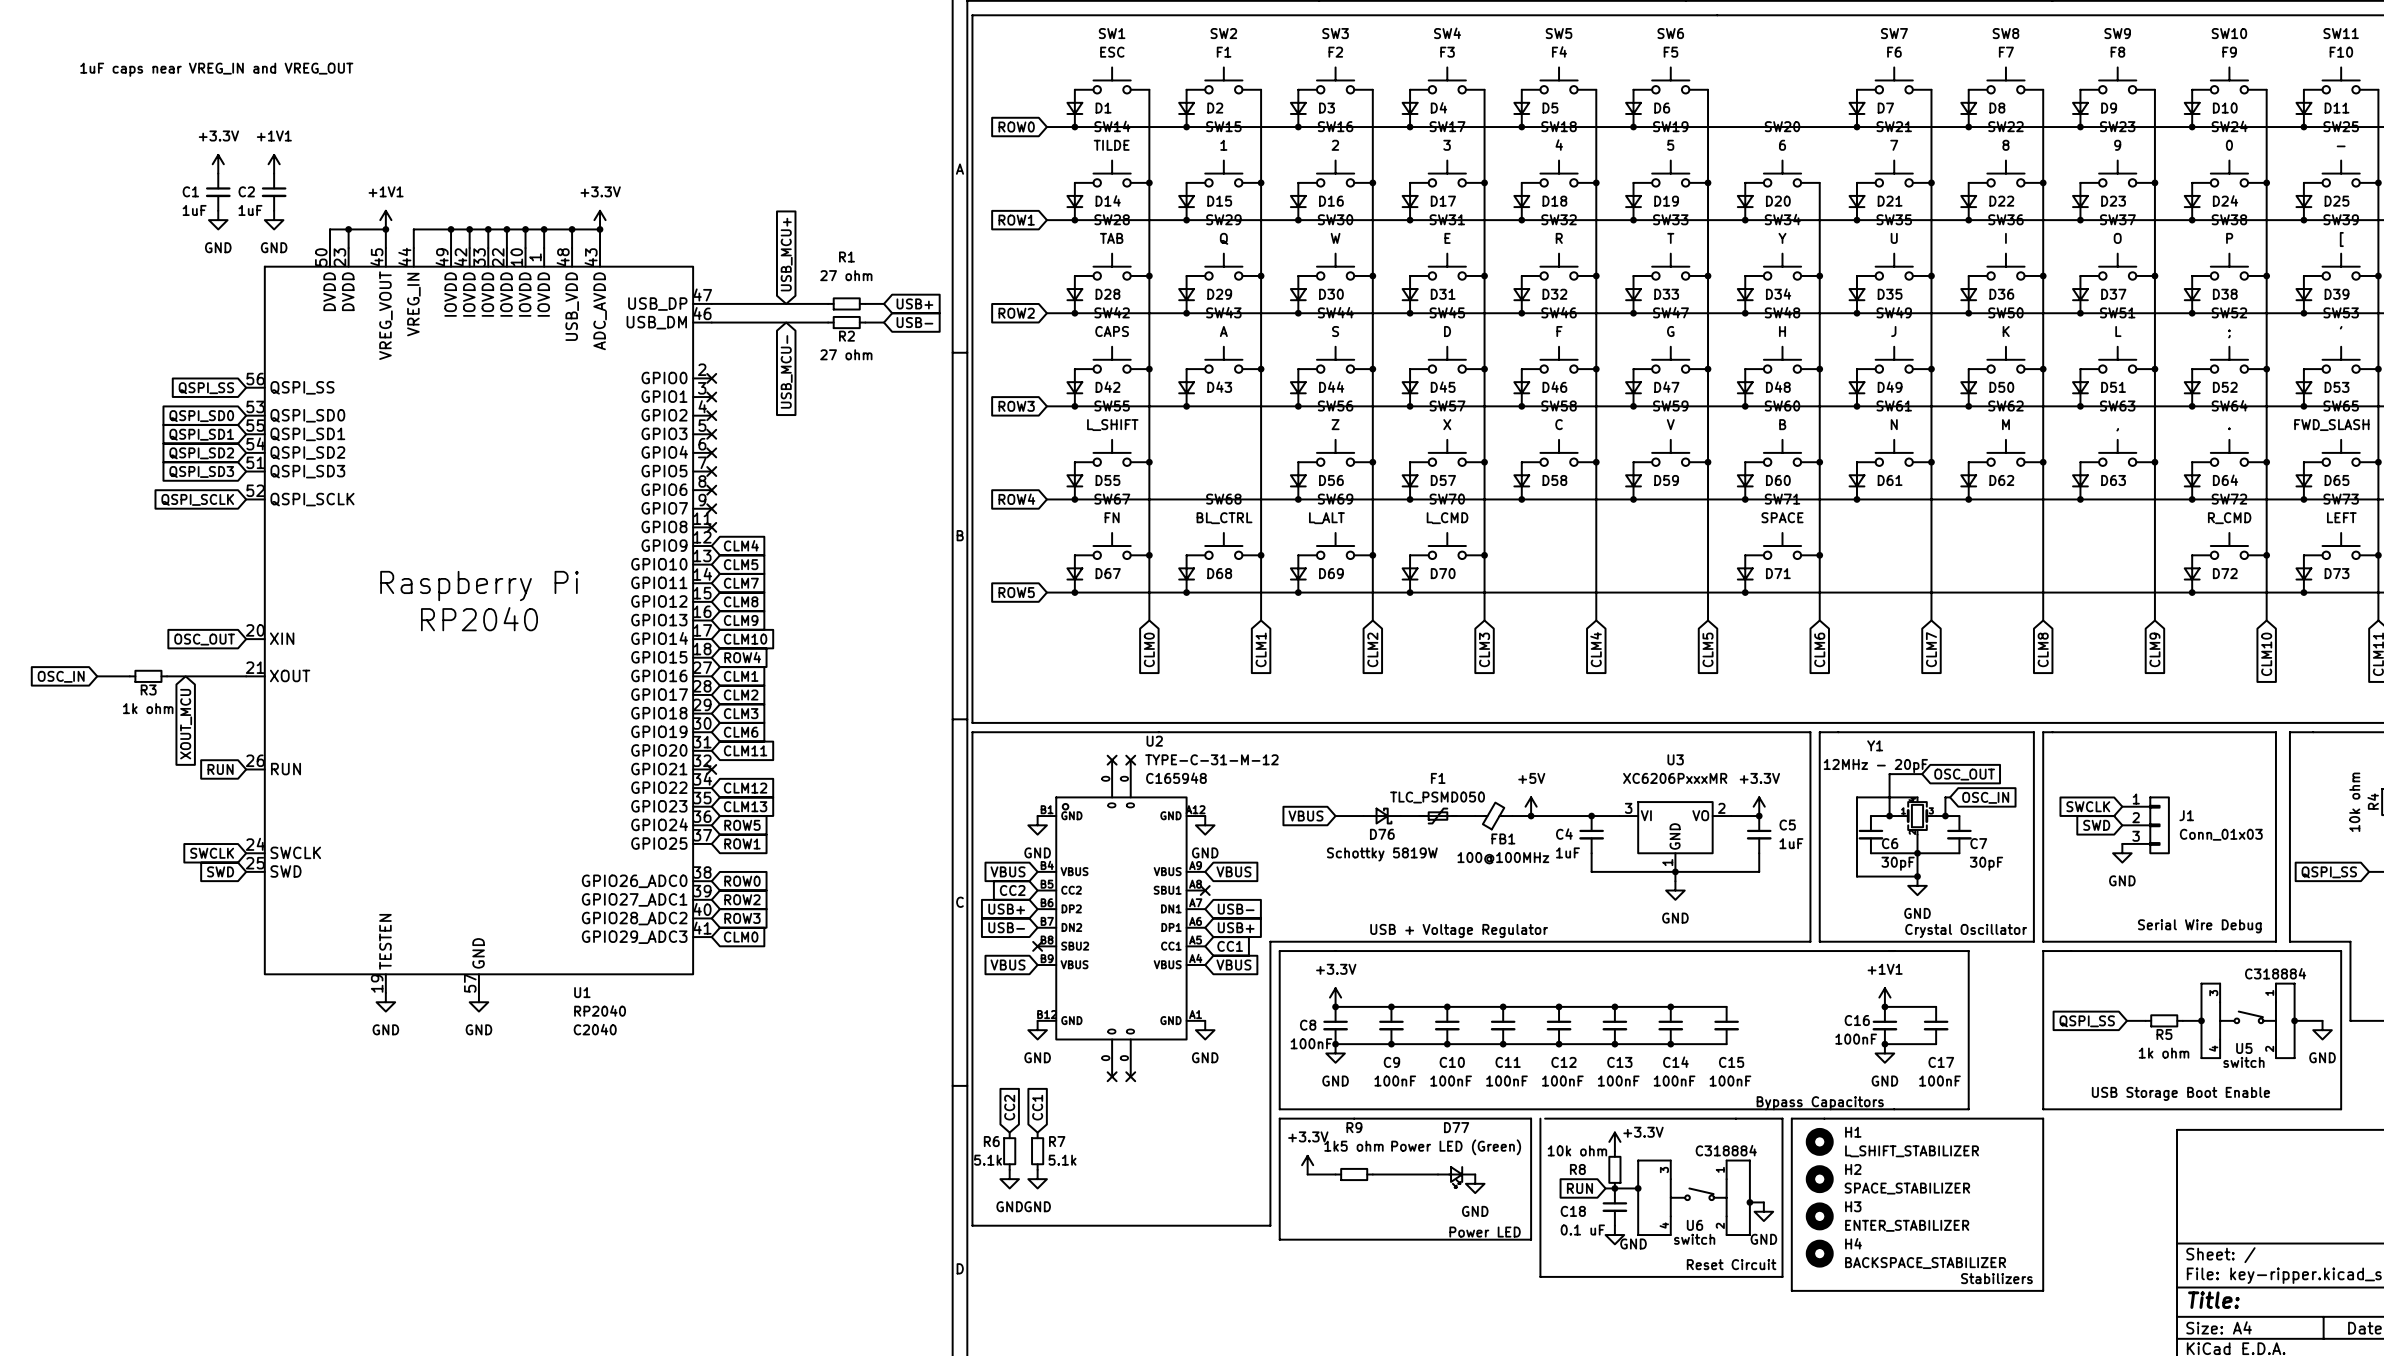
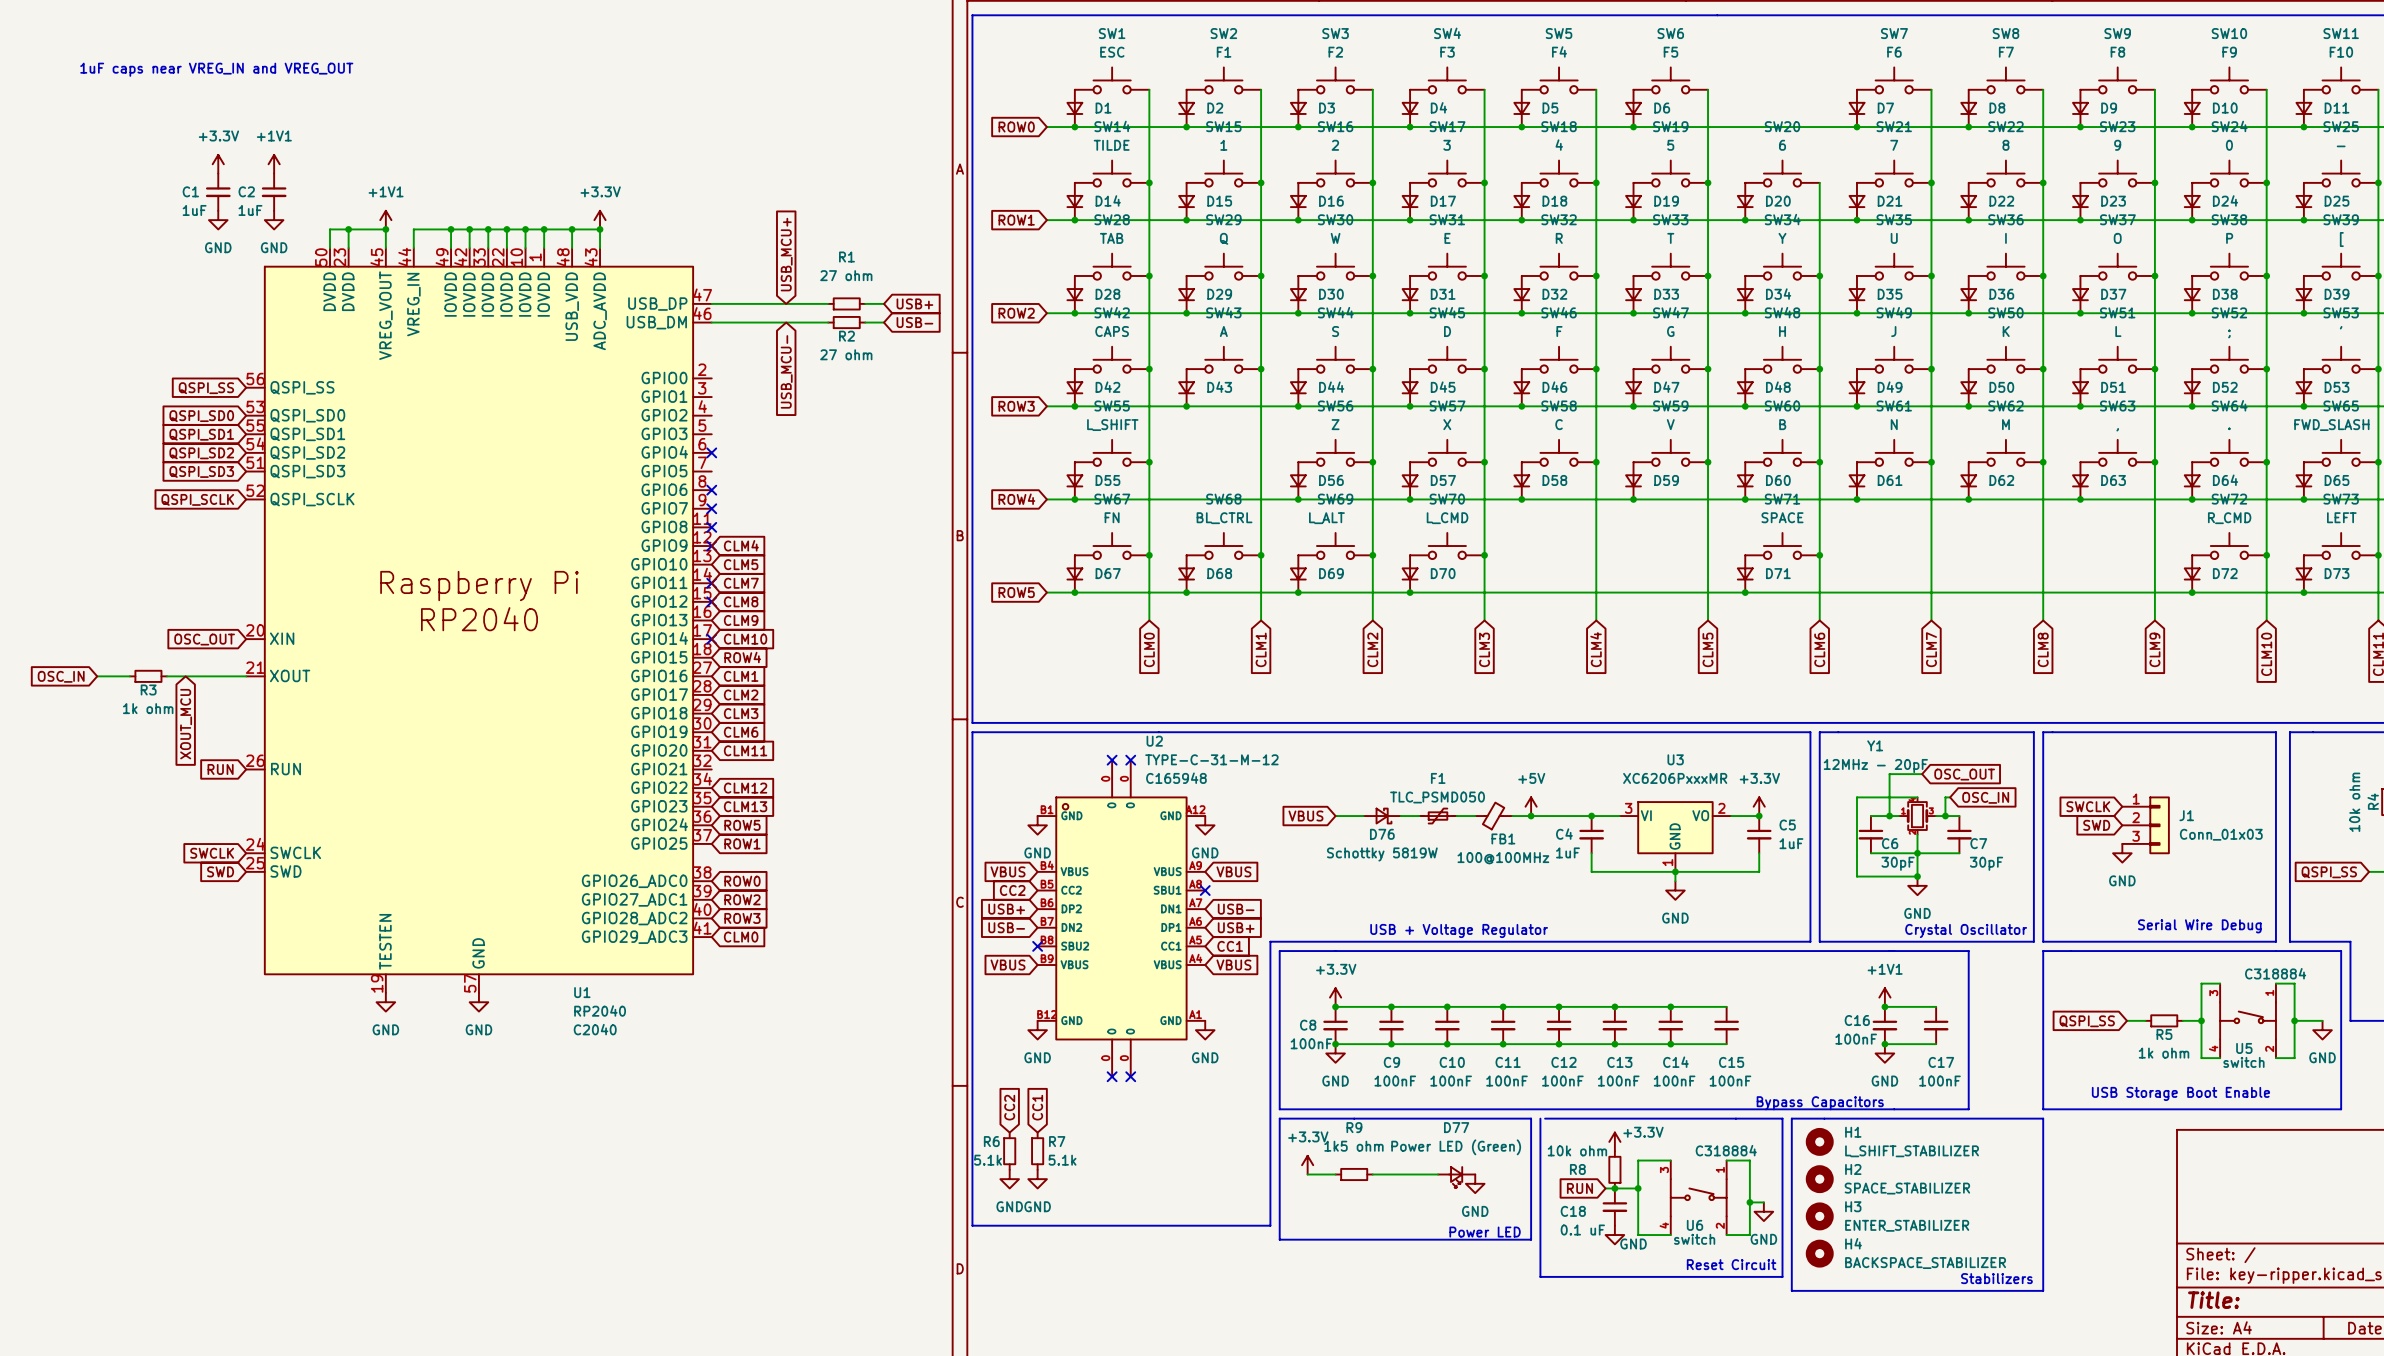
no-connect mark: (711, 378) -> none
no-connect mark: (711, 397) -> none
no-connect mark: (711, 415) -> none
no-connect mark: (711, 434) -> none
no-connect mark: (711, 471) -> none
no-connect mark: none -> (711, 546)
no-connect mark: none -> (711, 583)
no-connect mark: none -> (711, 601)
no-connect mark: none -> (711, 639)
no-connect mark: (711, 769) -> none

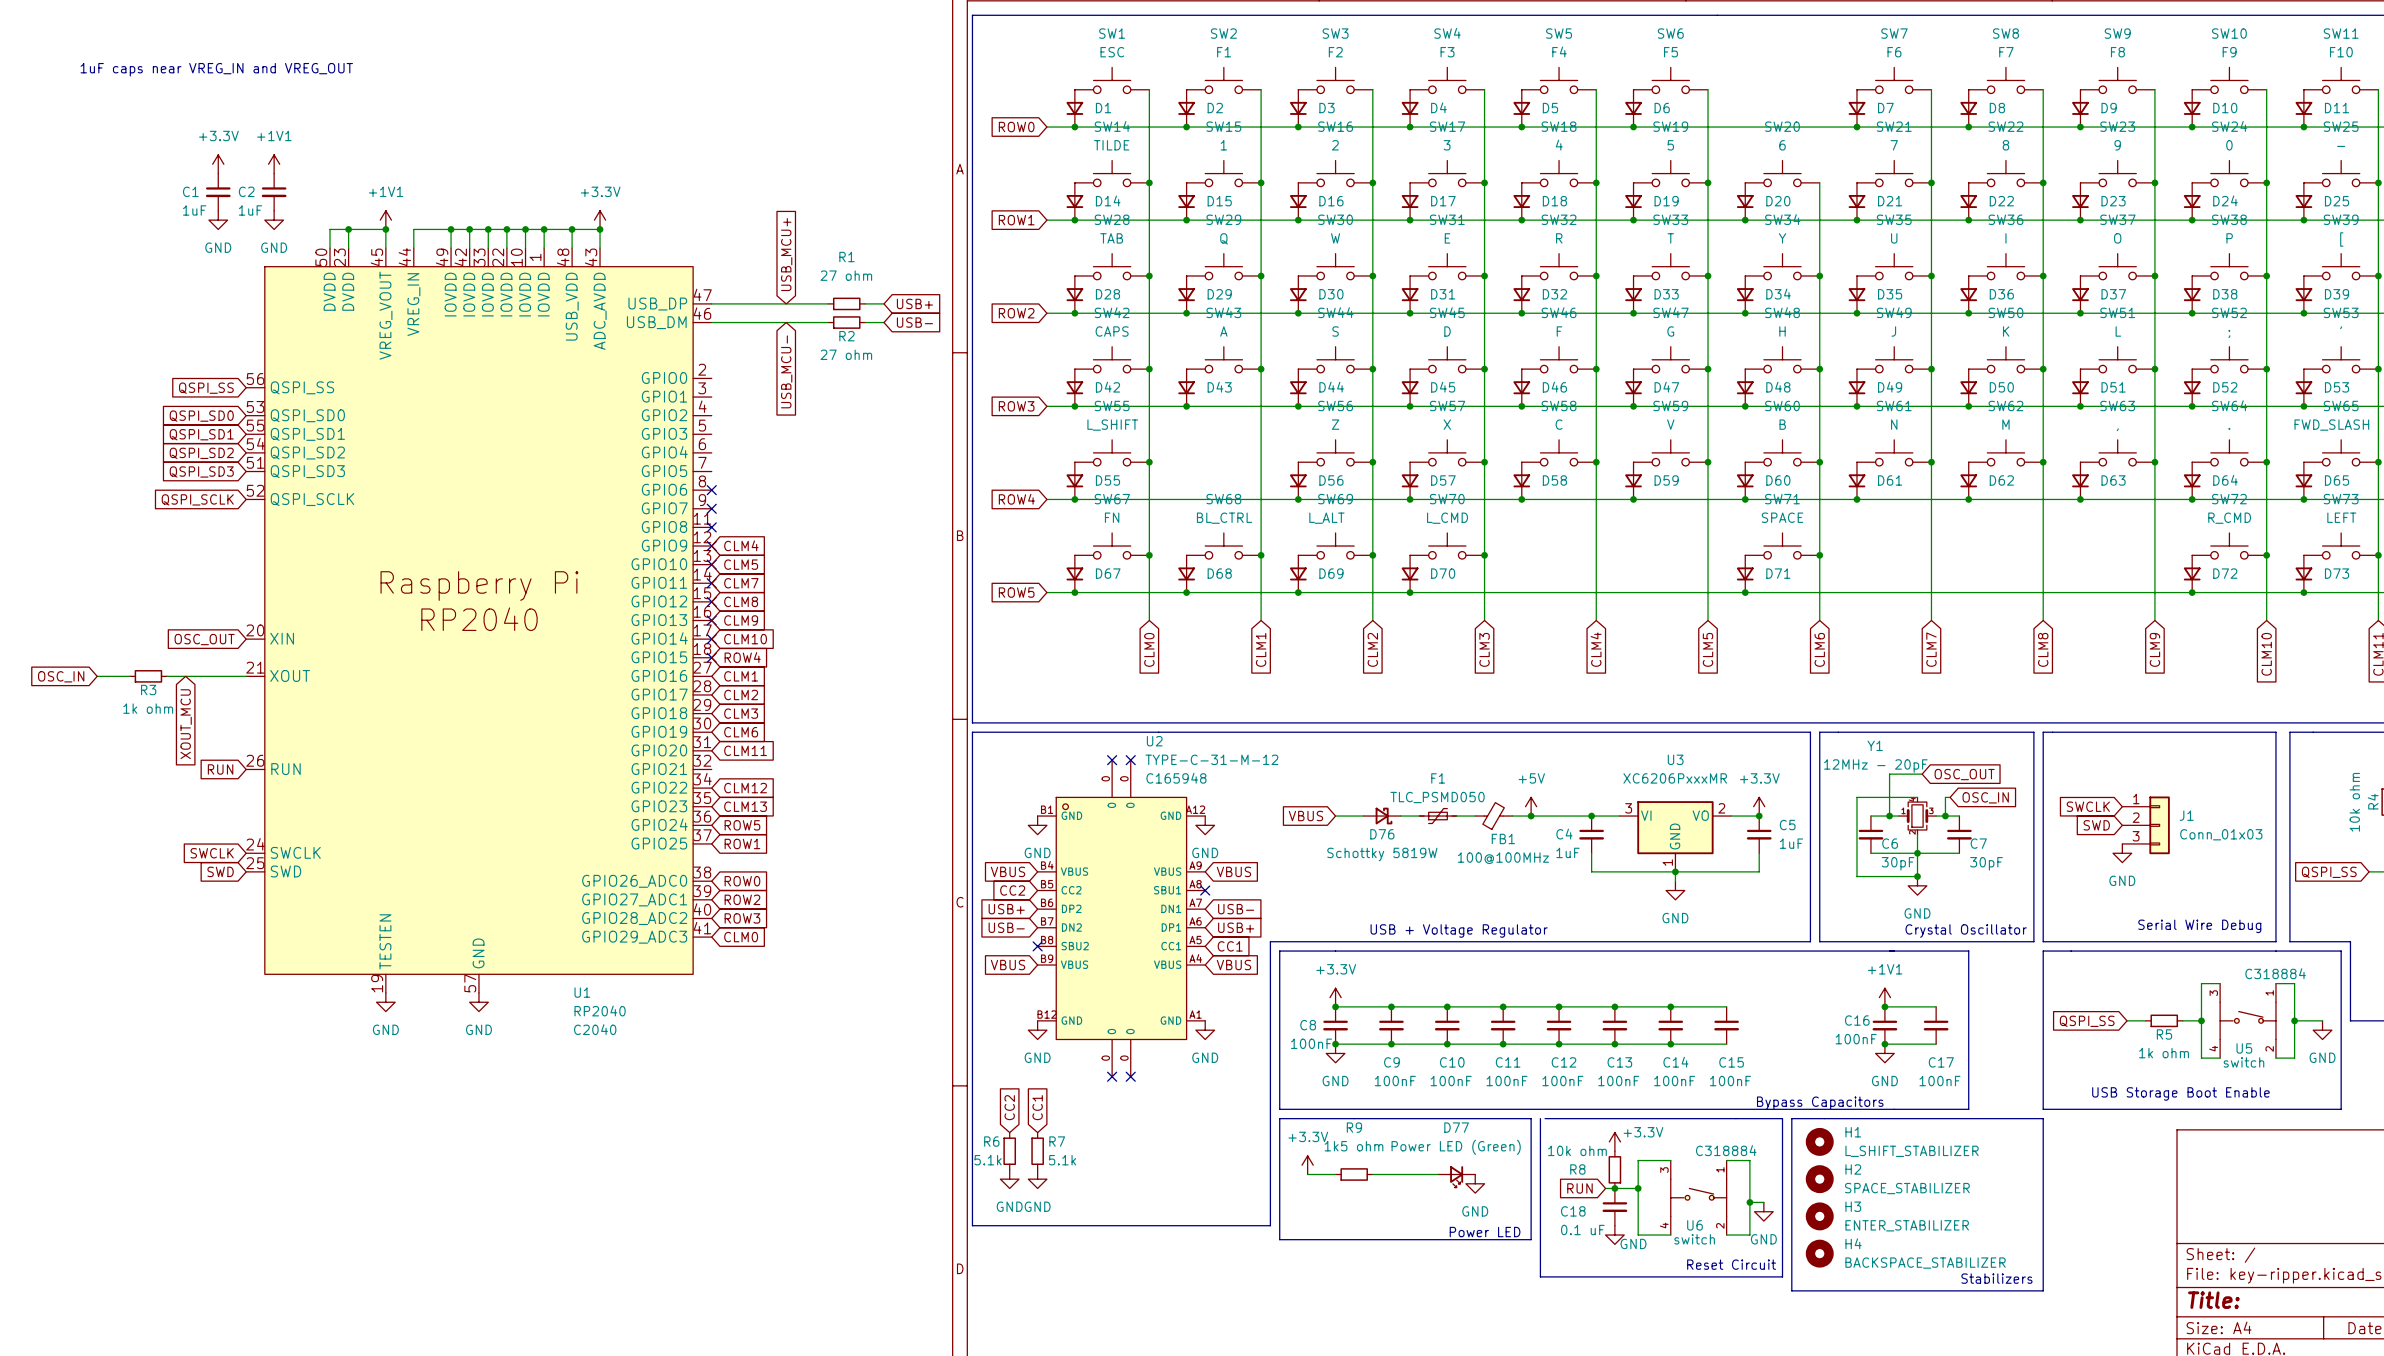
no-connect mark: (711, 452) -> none
no-connect mark: none -> (711, 564)
no-connect mark: none -> (711, 620)
no-connect mark: none -> (711, 657)

